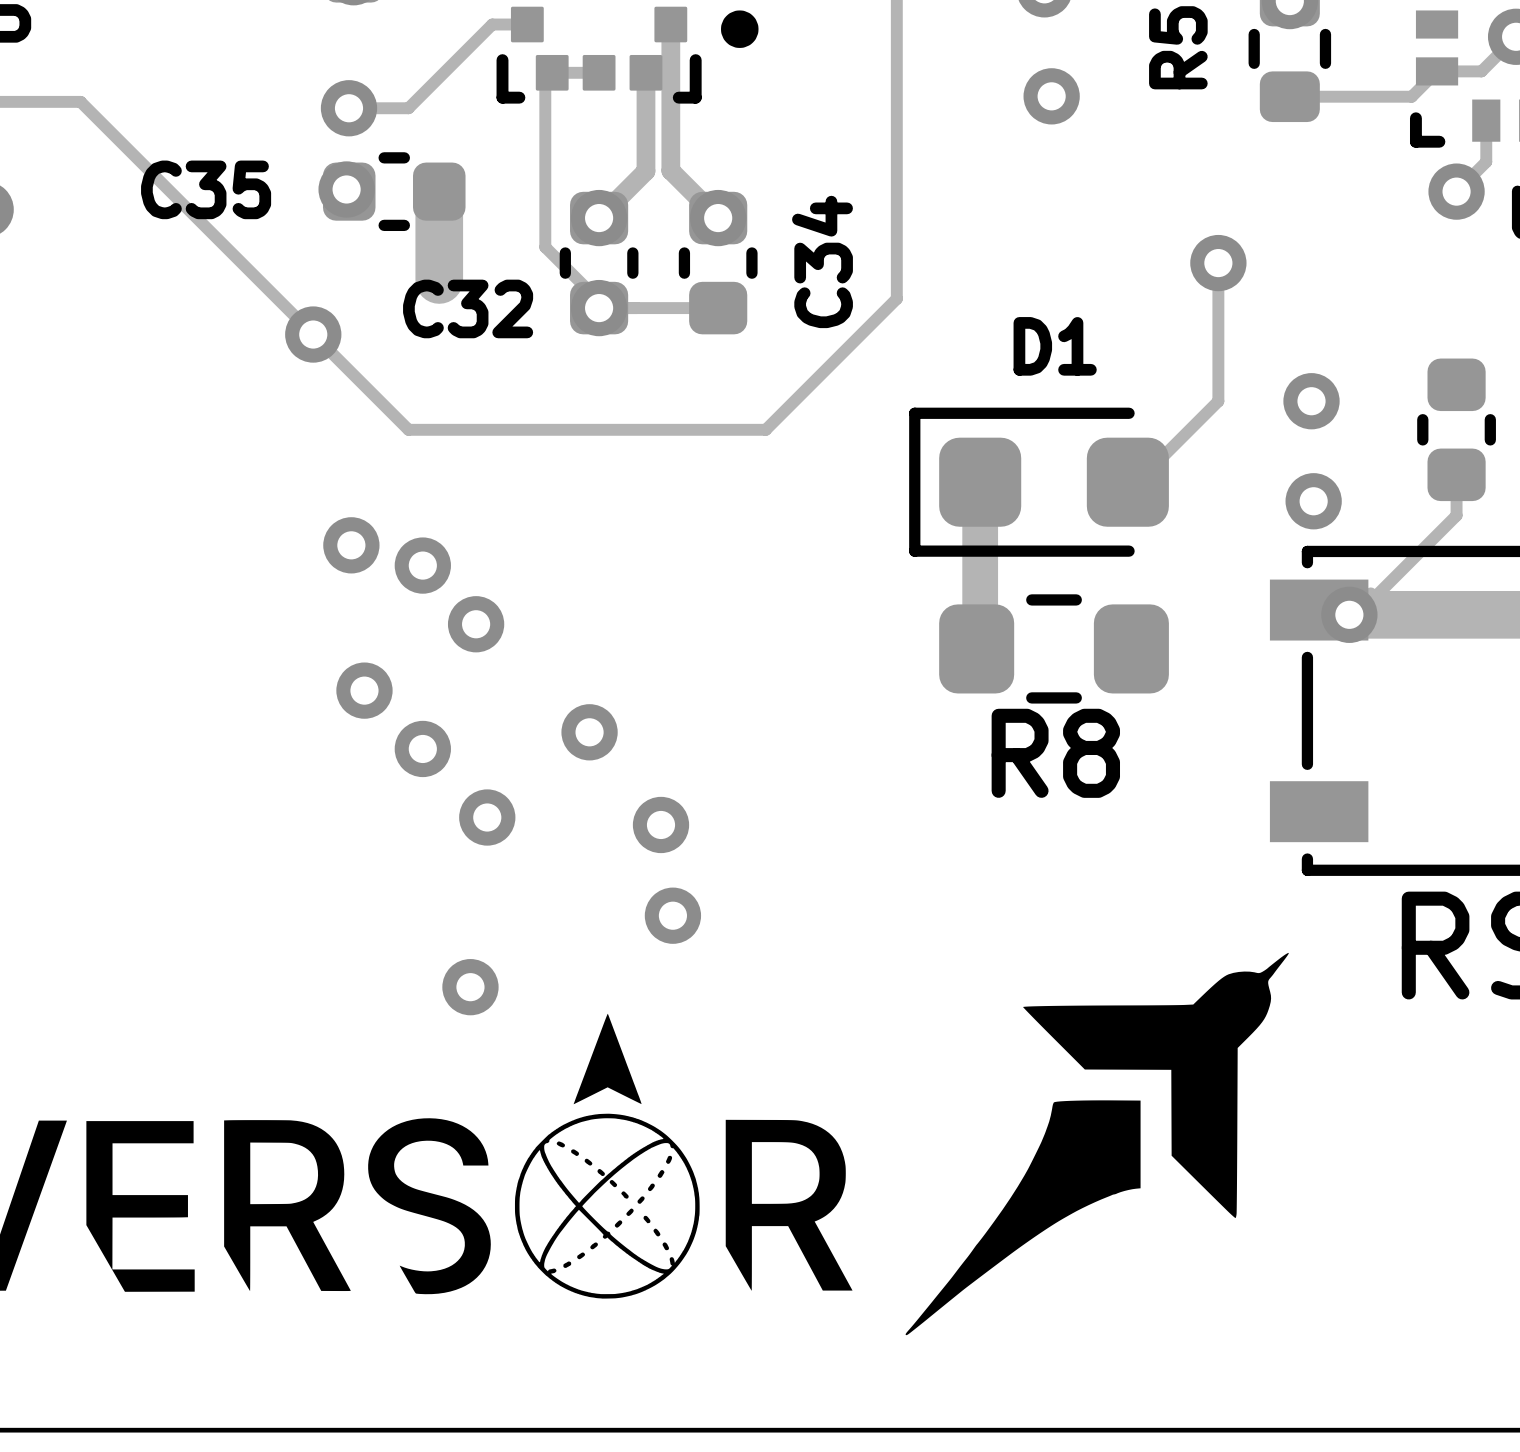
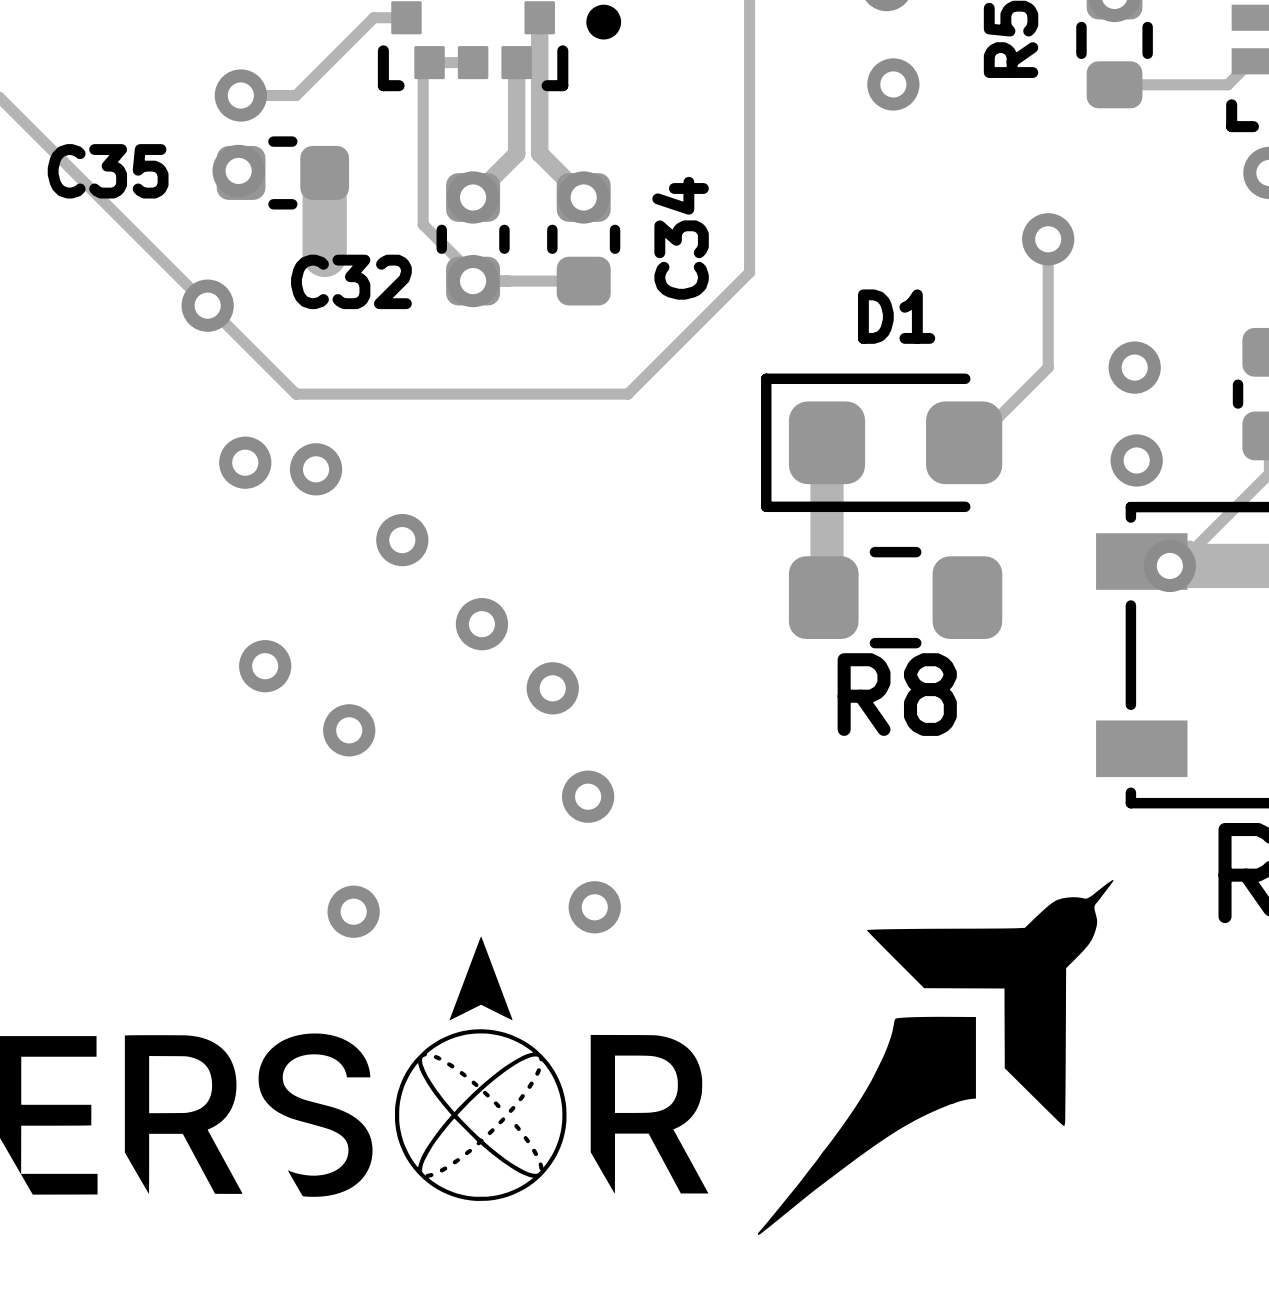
via position: (351, 545) -> (245, 462)
via position: (422, 565) -> (316, 469)
via position: (476, 624) -> (402, 540)
via: (364, 690) -> none
via: none -> (265, 666)
via position: (589, 732) -> (481, 624)
via: none -> (552, 688)
via: (422, 748) -> none
via: none -> (349, 730)
via: (487, 817) -> none
via: (661, 824) -> none
via position: (672, 915) -> (588, 796)
via: none -> (594, 907)

